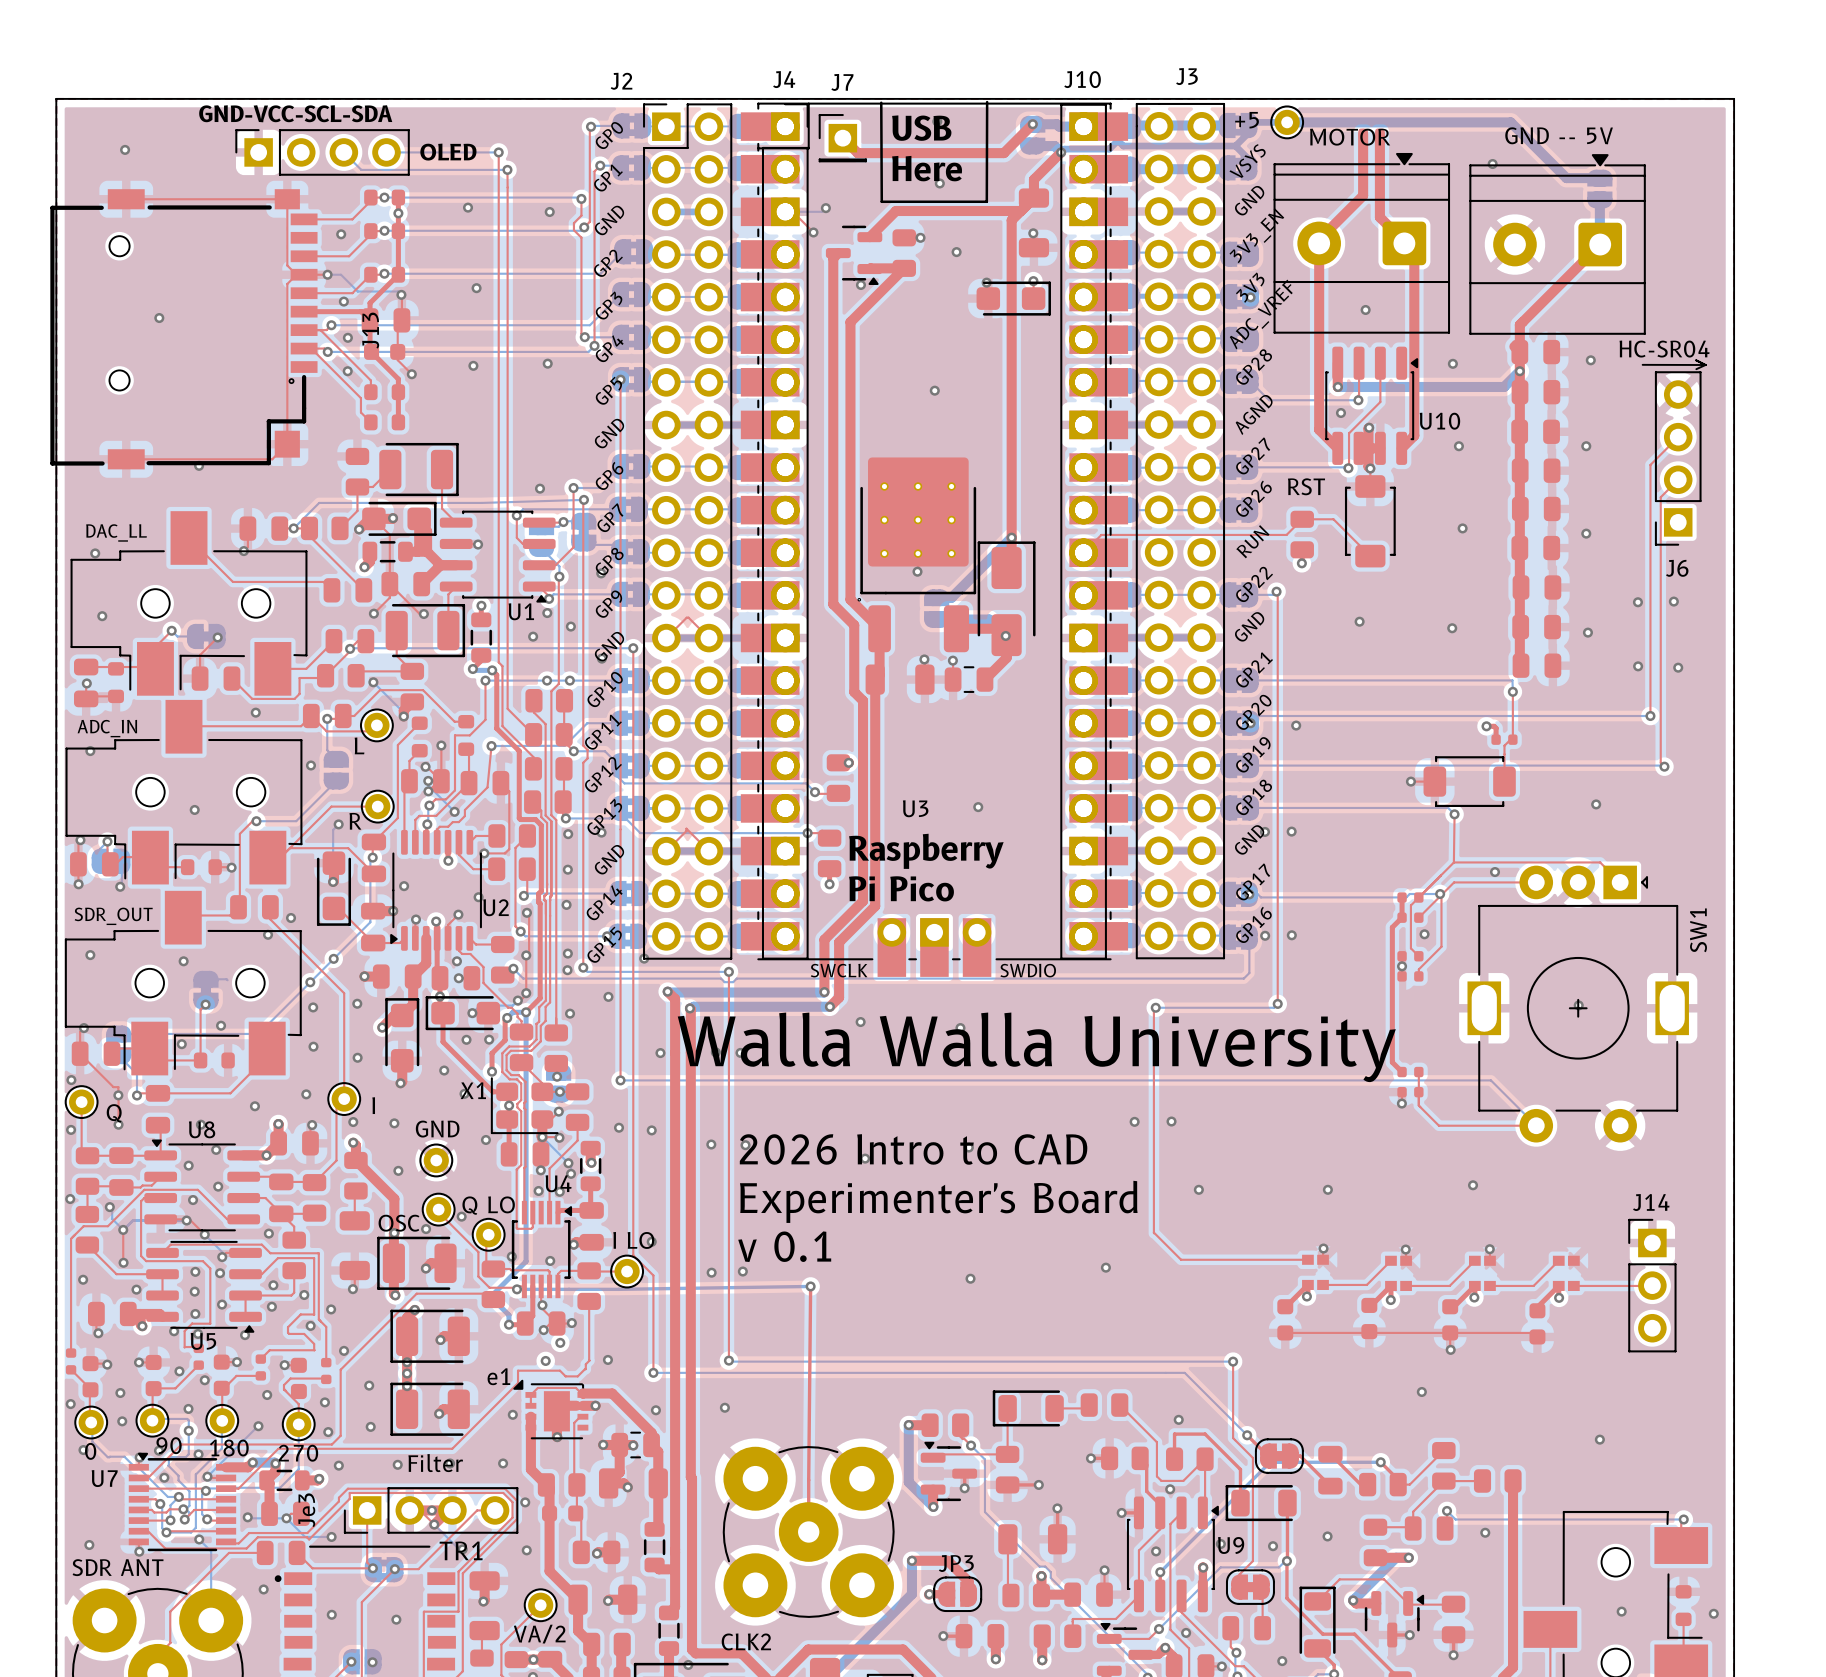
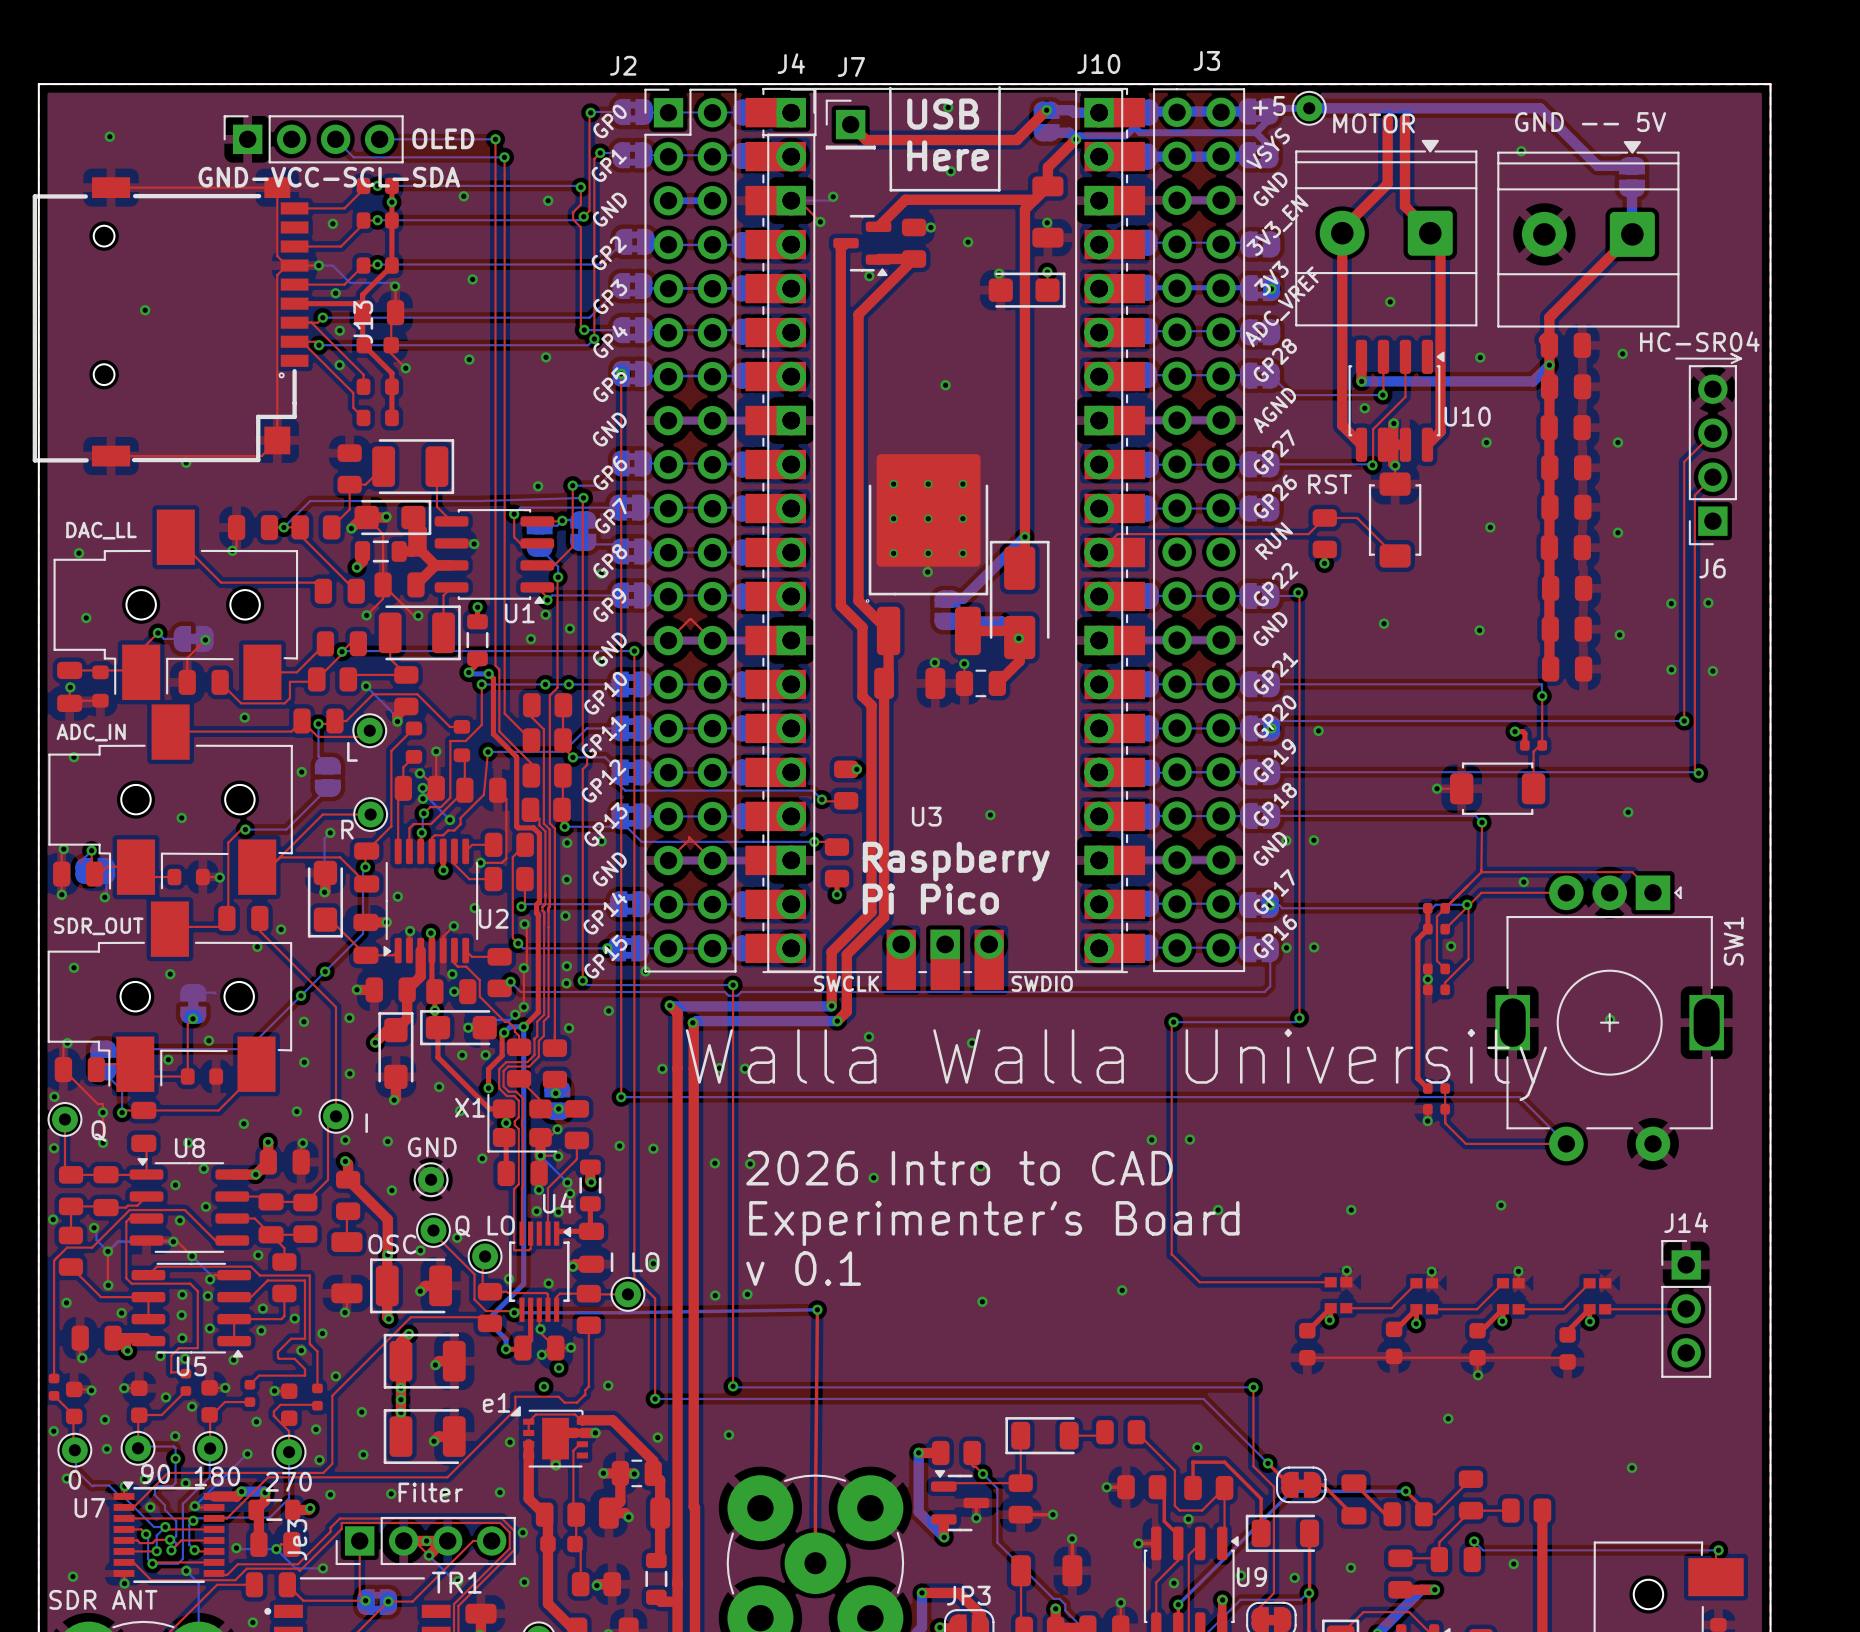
text position: GND-VCC-SCL-SDA (295, 113) -> GND-VCC-SCL-SDA (329, 177)

